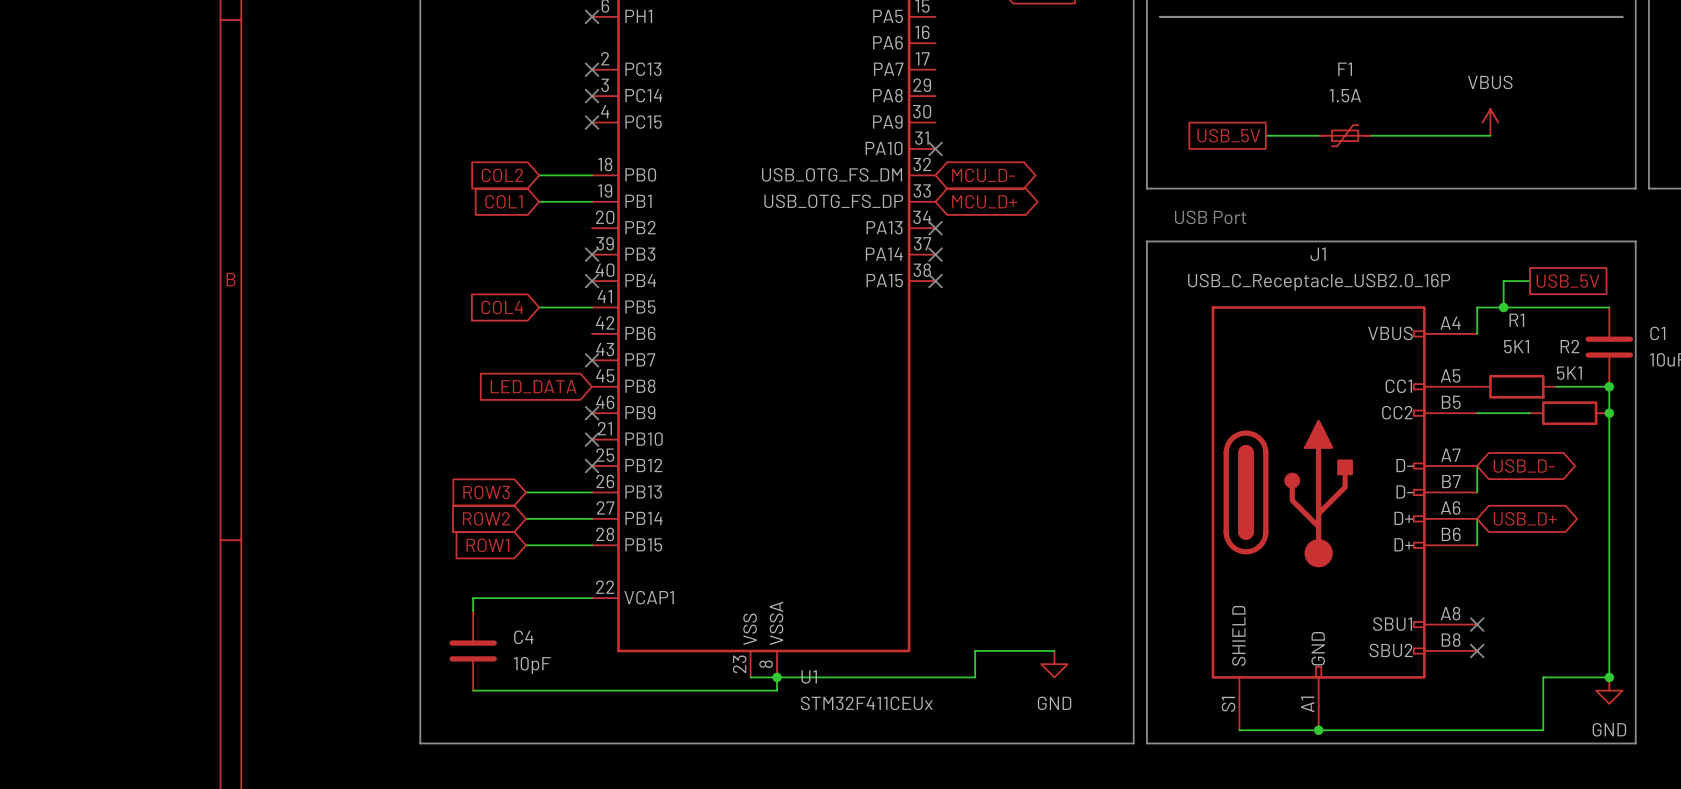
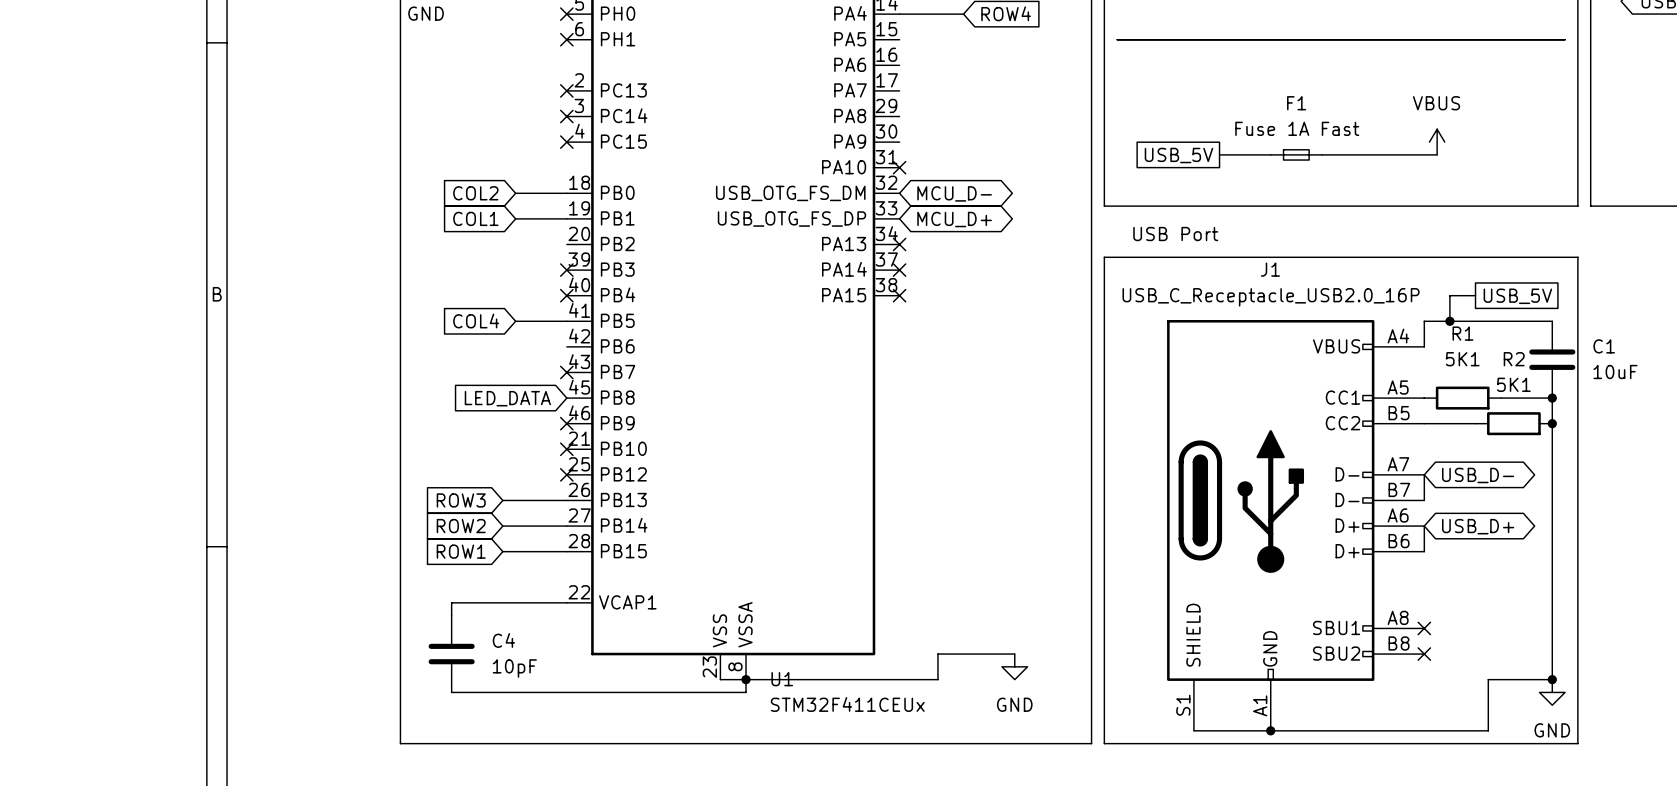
F1 value: 1.5A (1345, 95) -> Fuse 1A Fast (1297, 128)
F1 symbol: [1318, 125, 1372, 147] -> [1270, 149, 1322, 161]

